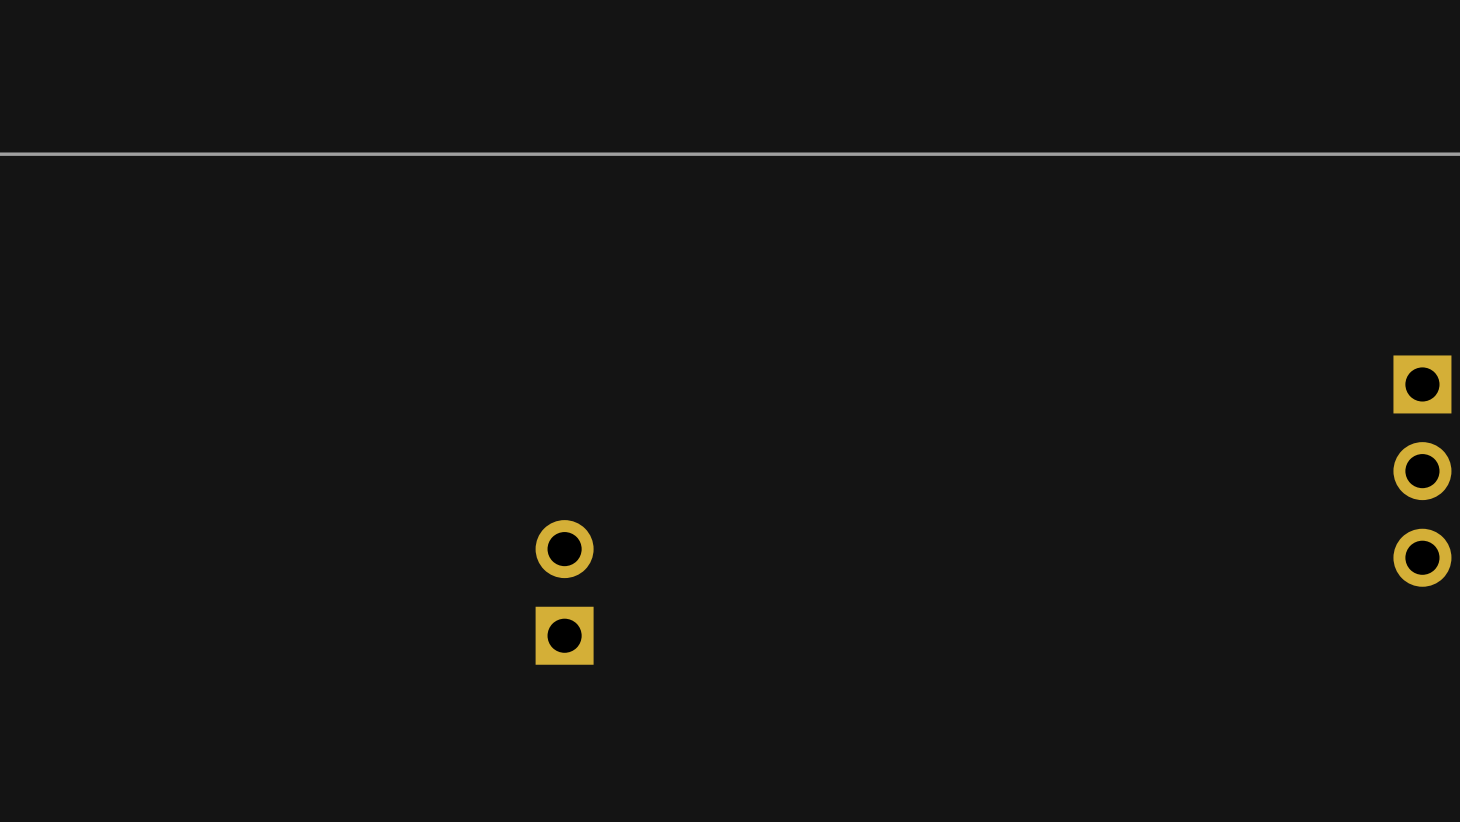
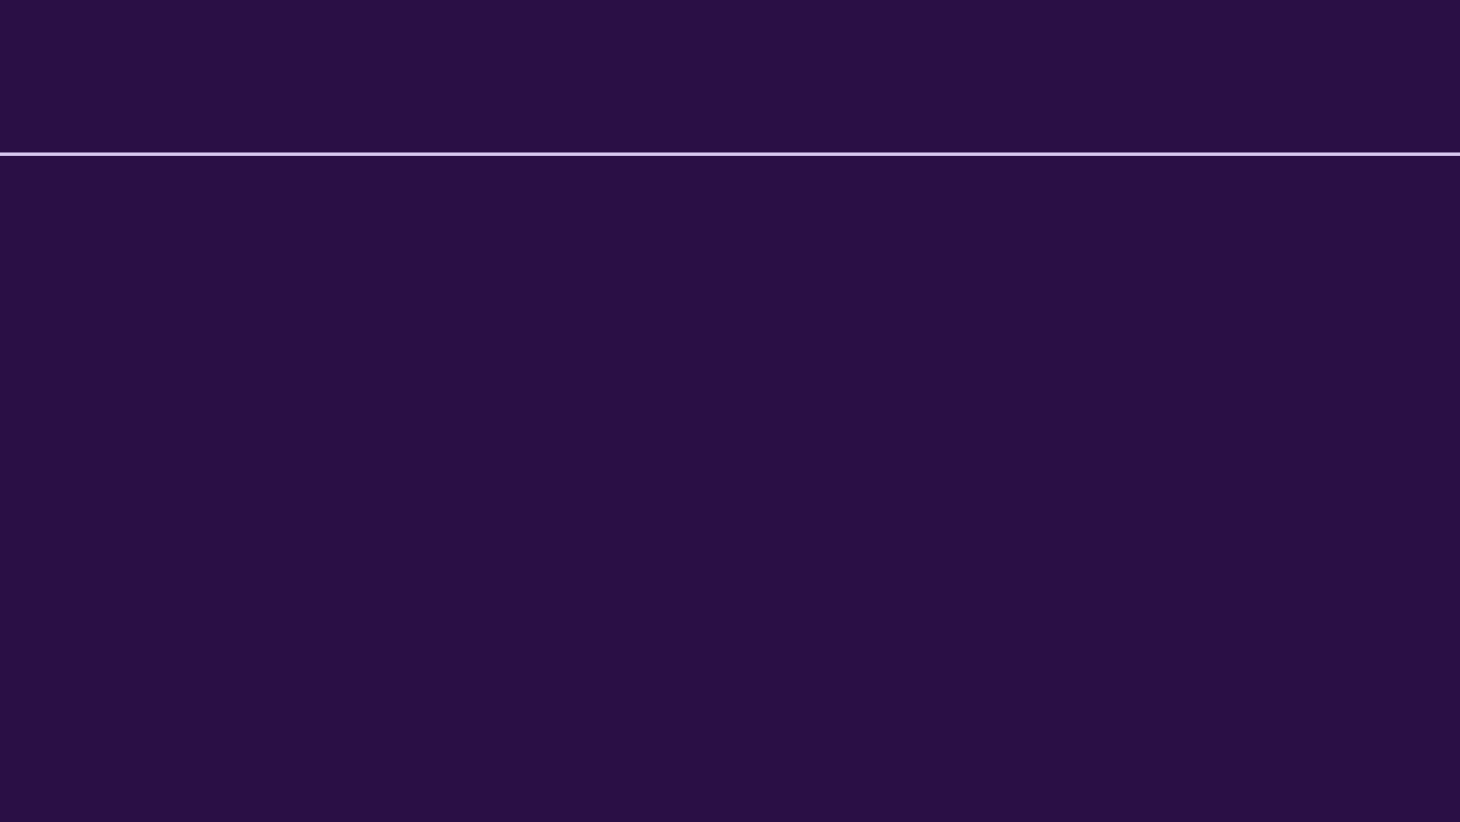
part: (1422, 471) -> none
part: (564, 592) -> none

